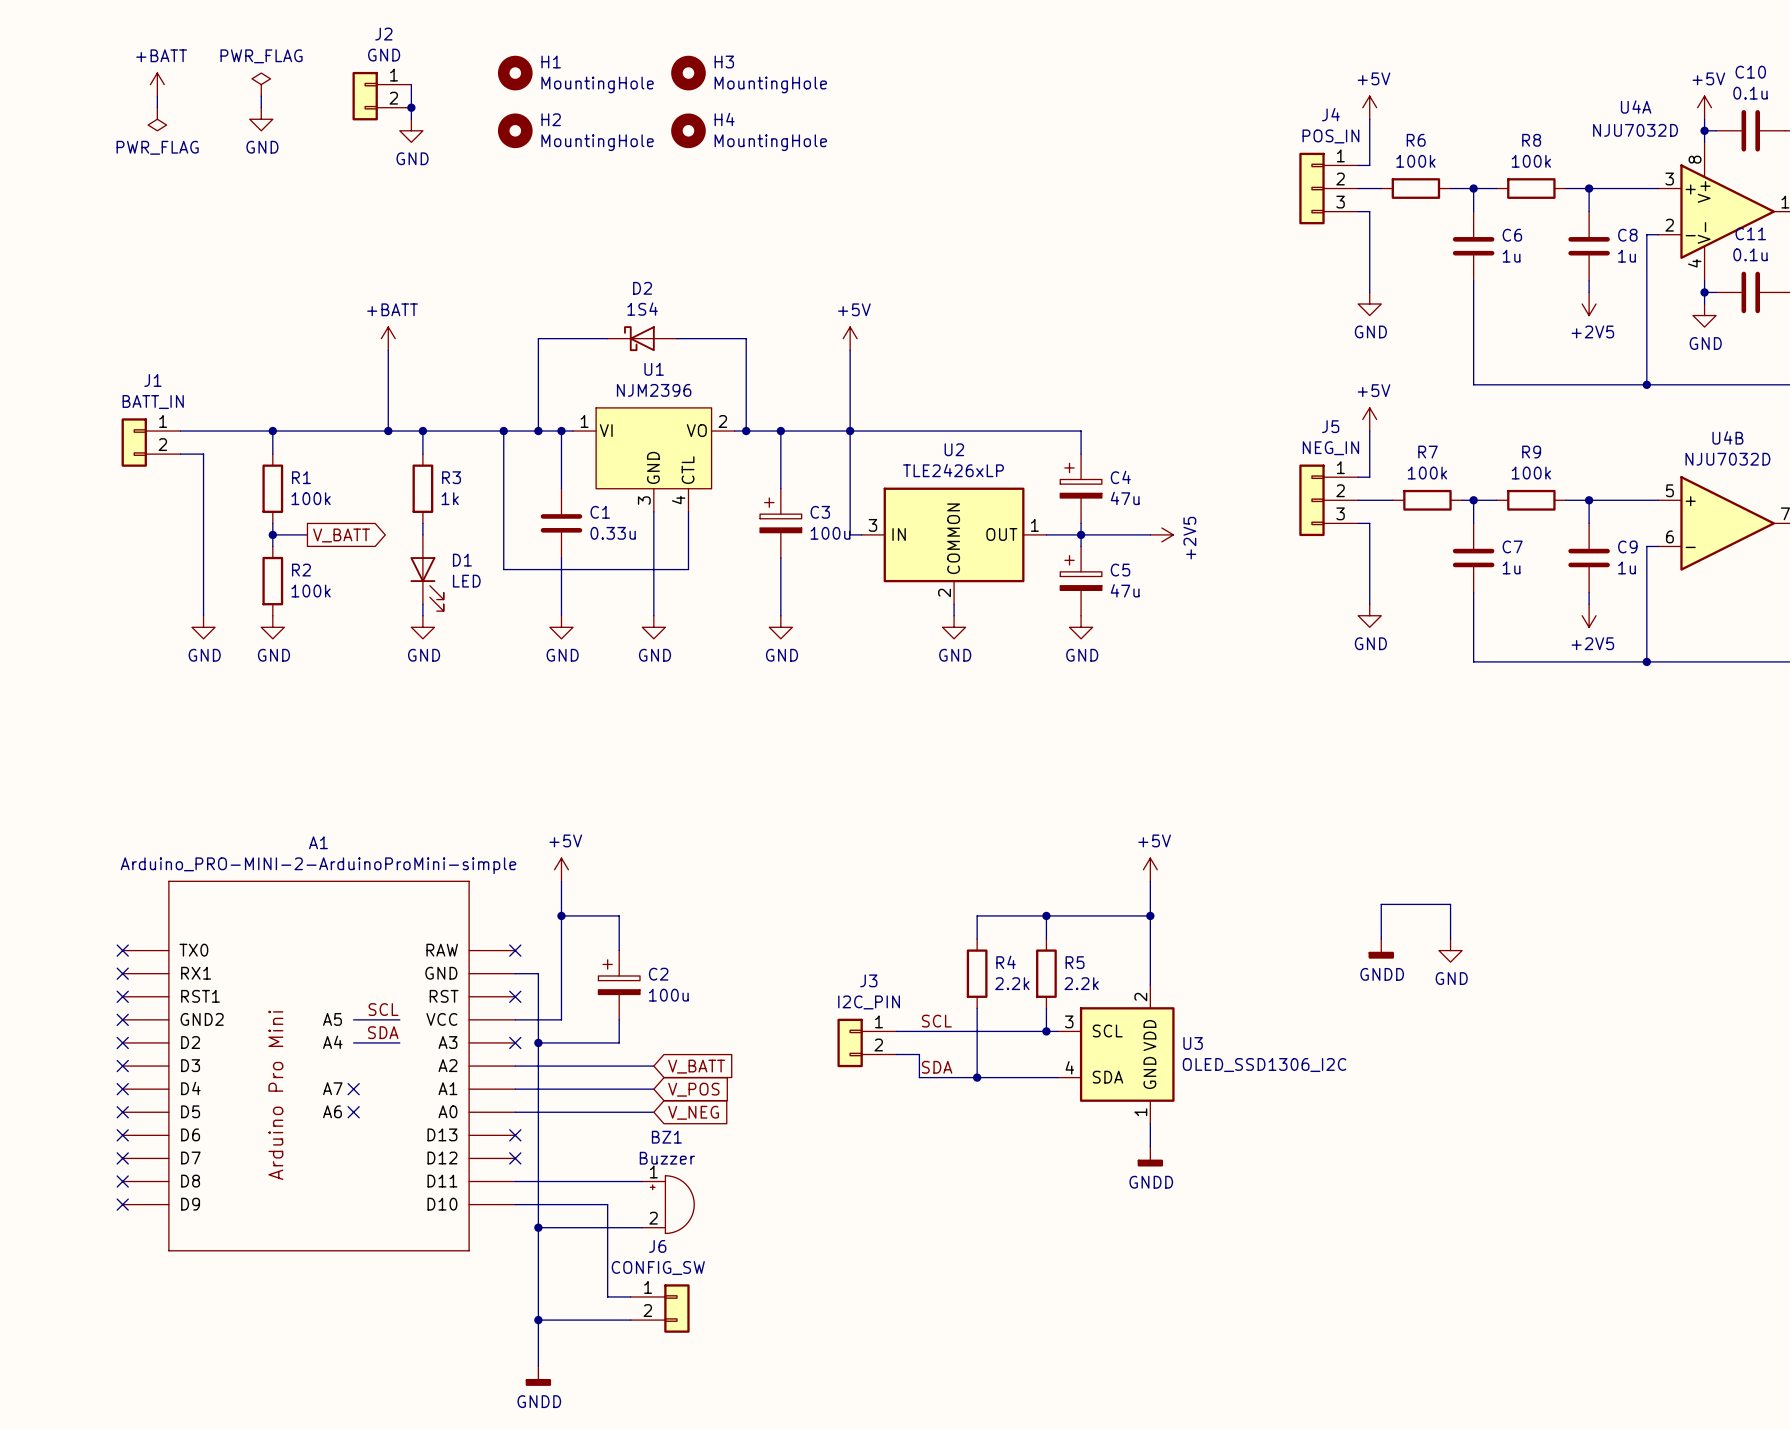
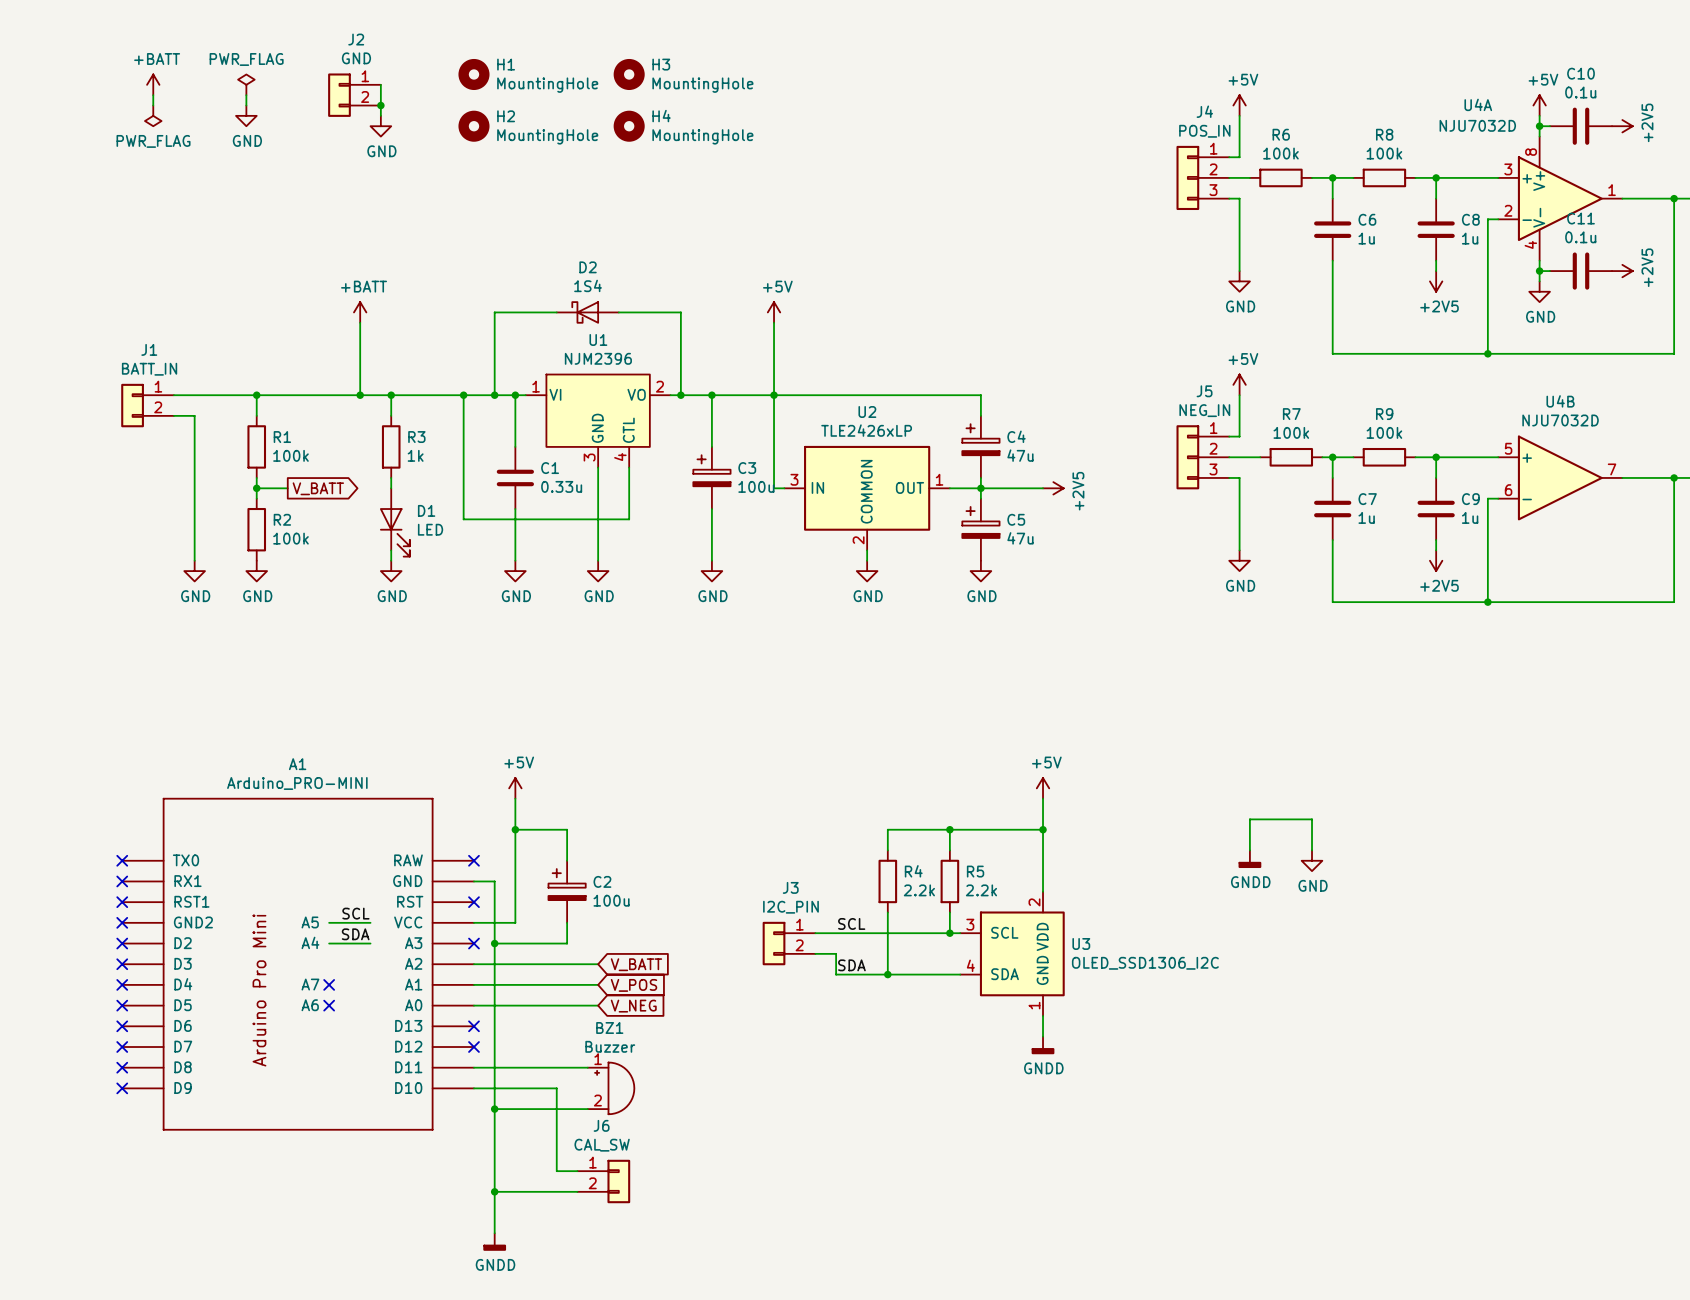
A1 value: Arduino_PRO-MINI-2-ArduinoProMini-simple (318, 865) -> Arduino_PRO-MINI (297, 783)
J6 value: CONFIG_SW (658, 1268) -> CAL_SW (602, 1145)

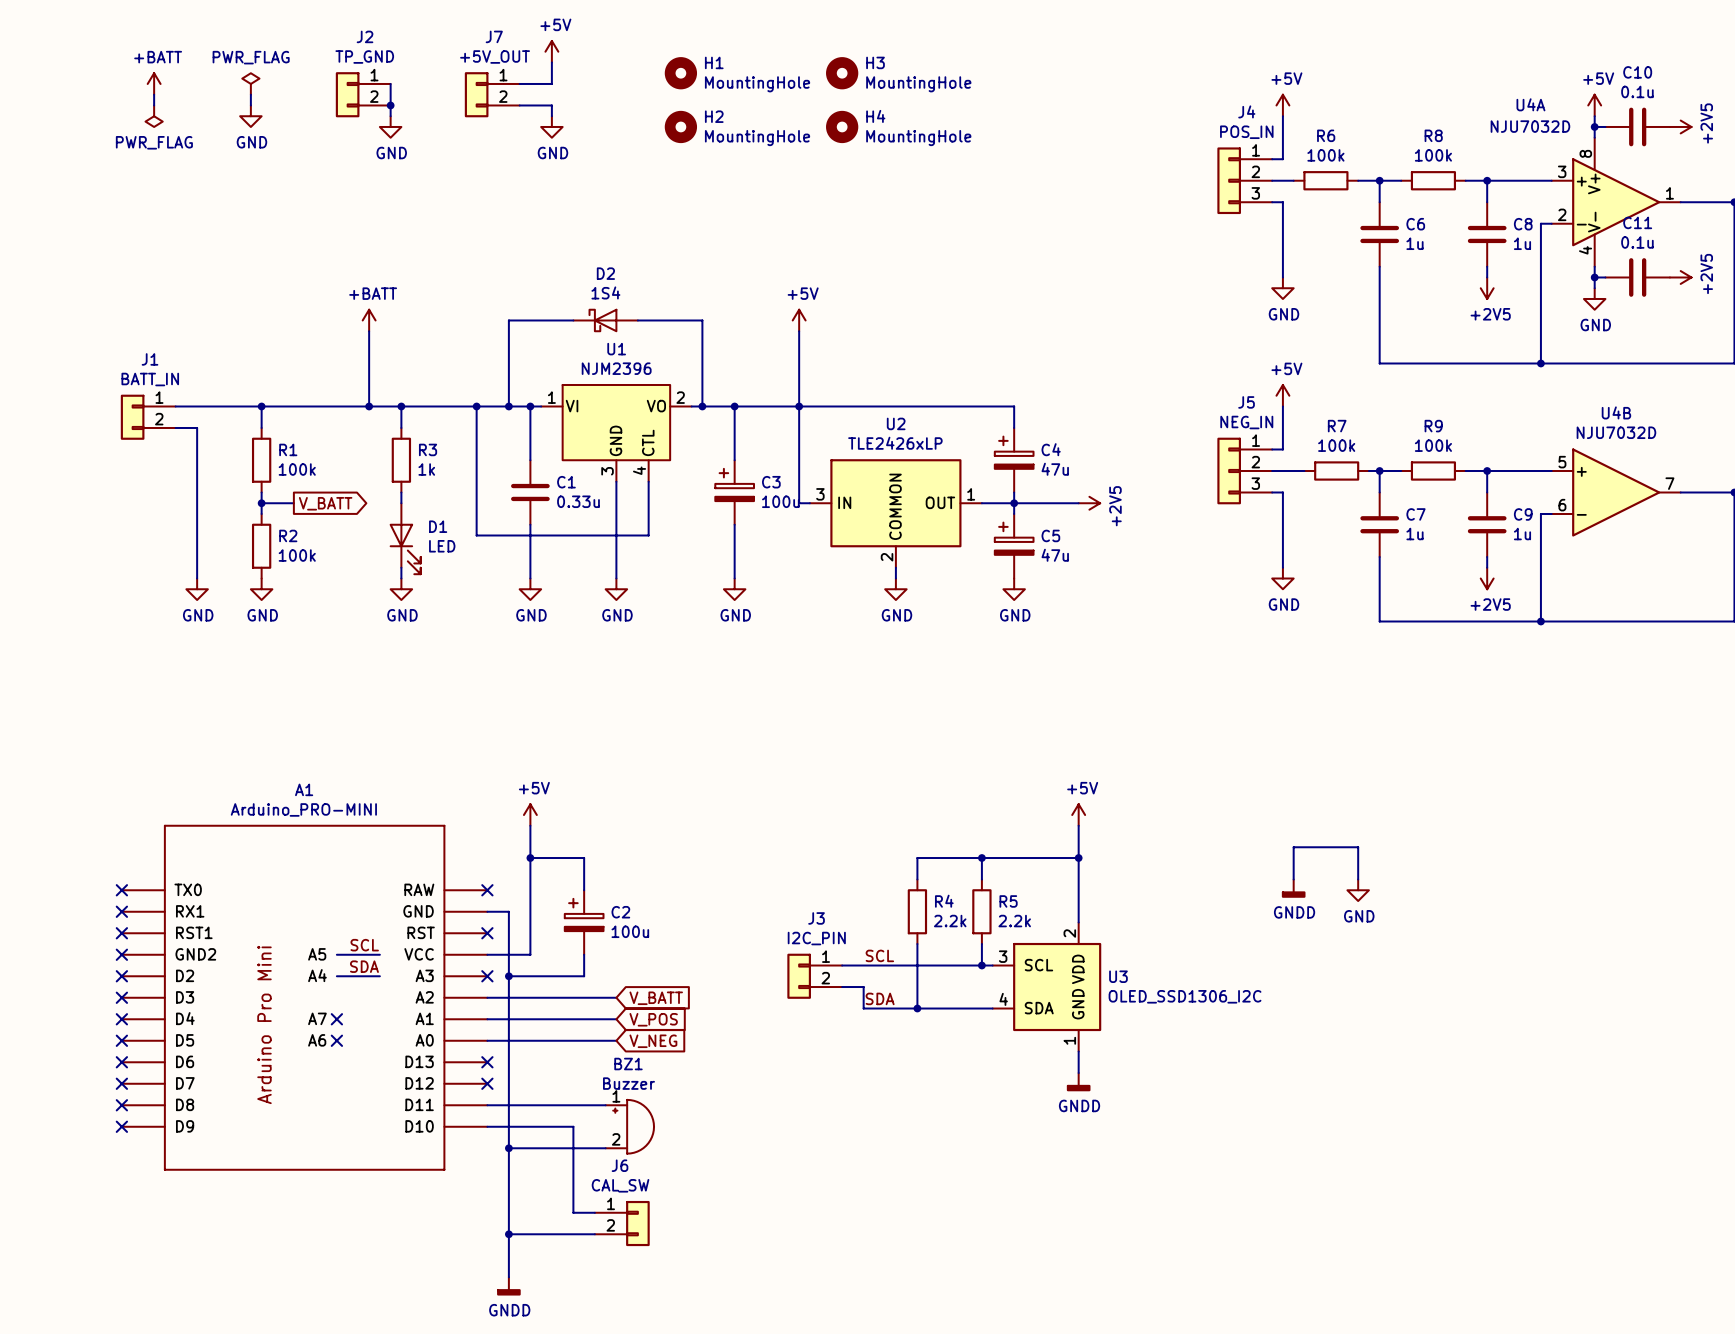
power symbol: none -> +5V (551, 51)
J2 value: GND (356, 58) -> TP_GND (364, 56)
wire: none -> (551, 62) (551, 83) (519, 83)
H1 position: (473, 74) -> (680, 73)
H3 position: (629, 74) -> (842, 73)
J7: none -> +5V_OUT (492, 94)
wire: none -> (519, 105) (551, 105) (551, 116)
H2 position: (473, 126) -> (680, 126)
power symbol: none -> GND (551, 126)
H4 position: (629, 126) -> (842, 126)

